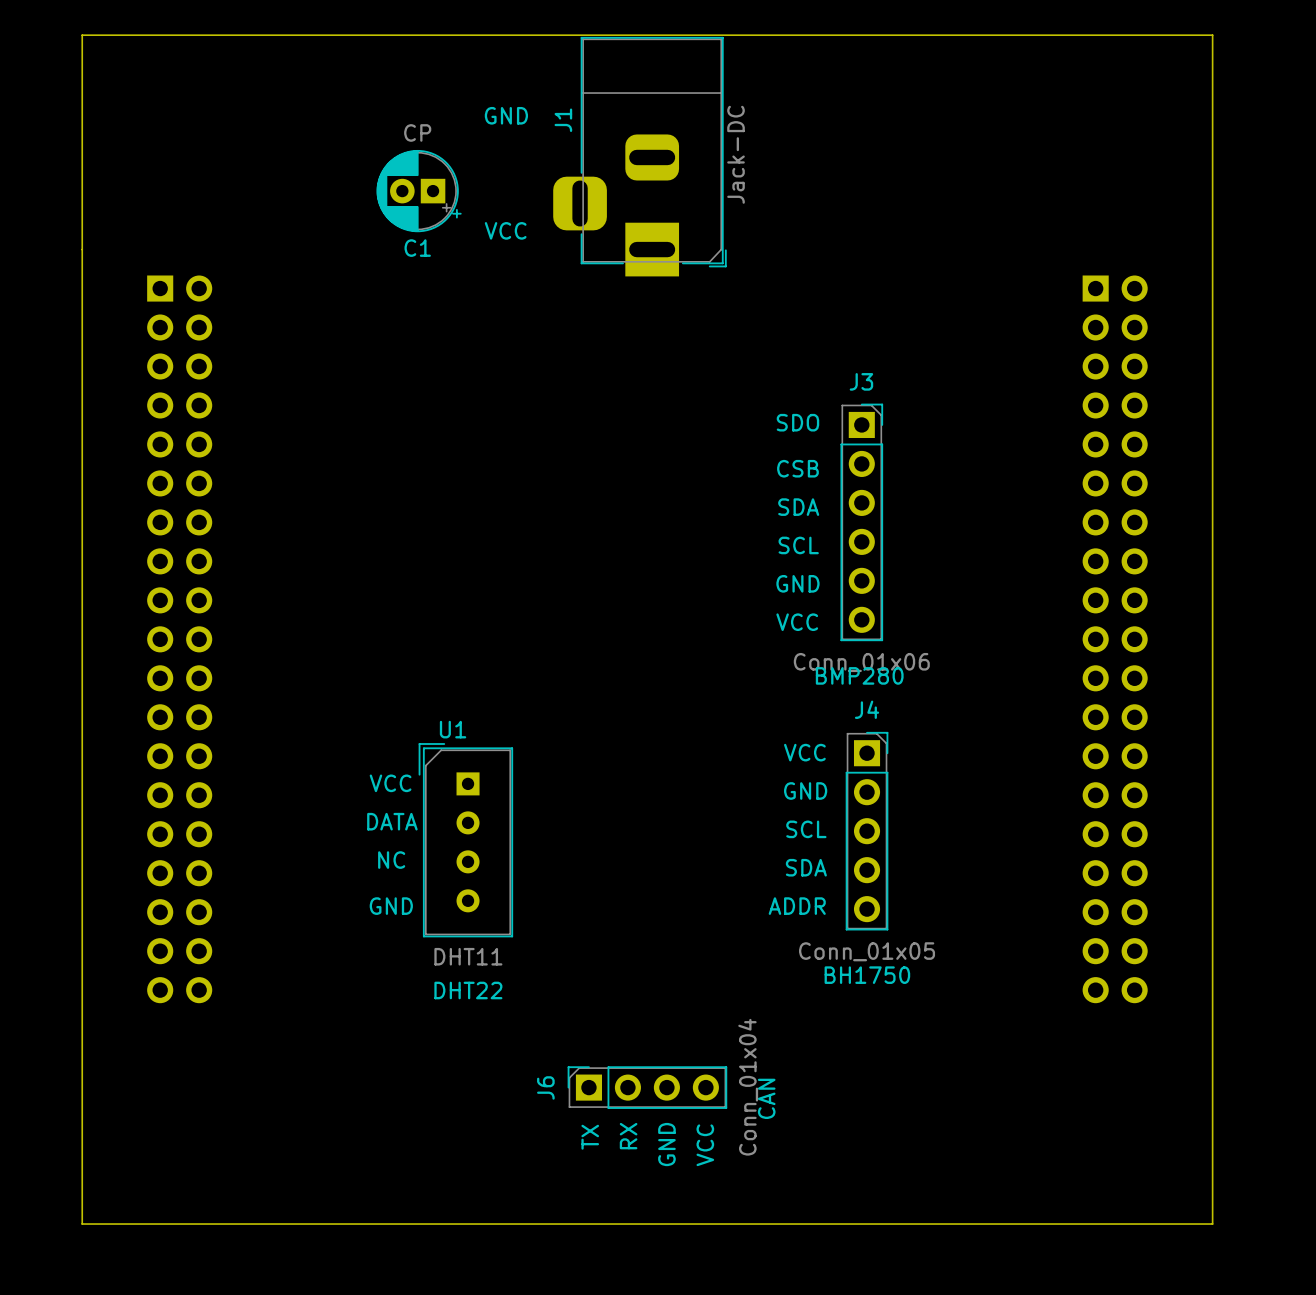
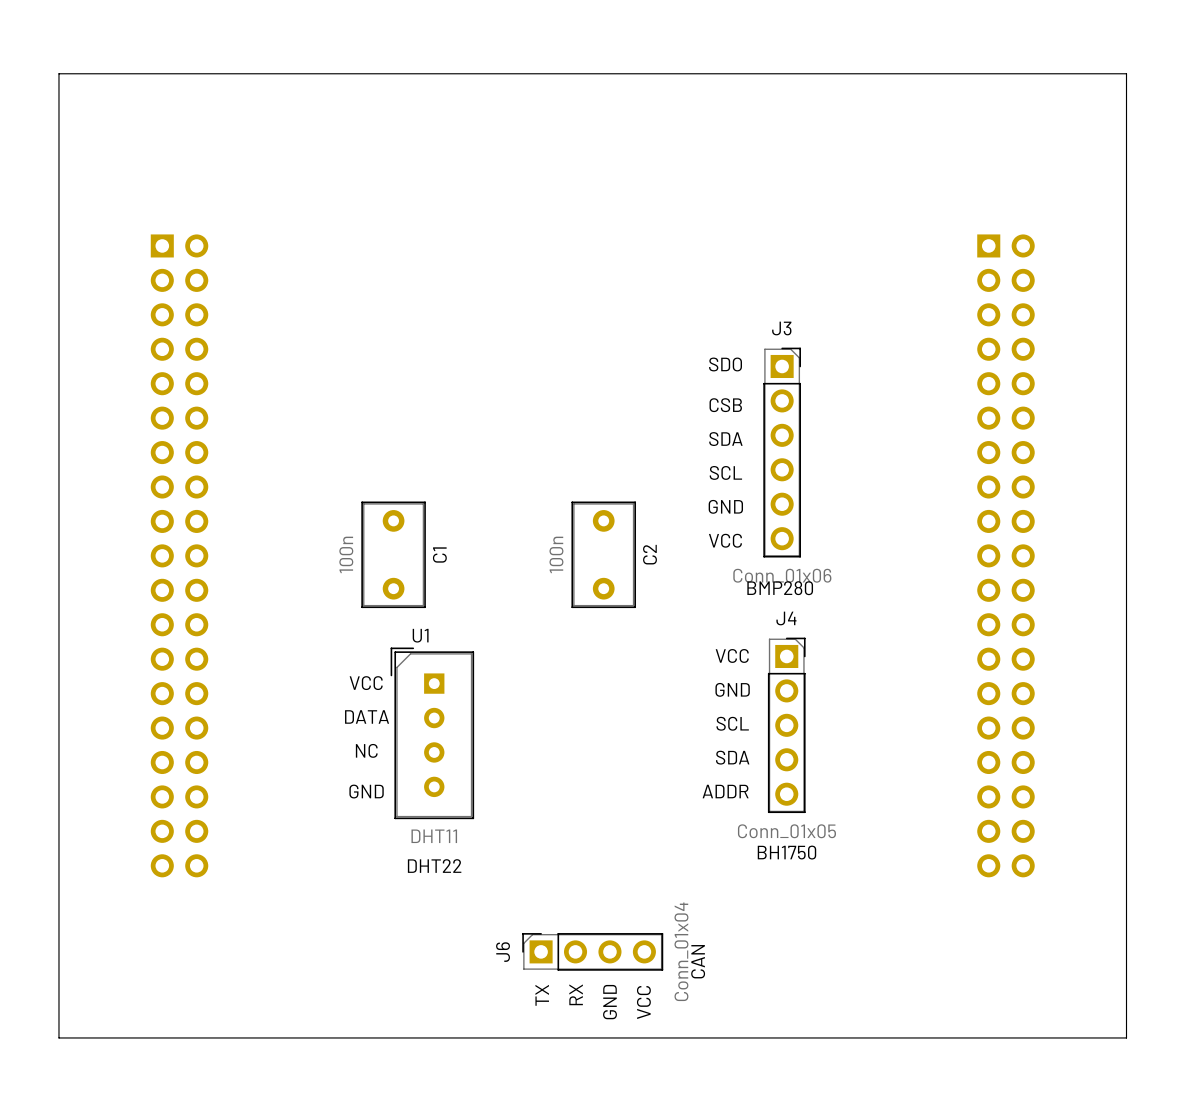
board edge: (82, 35) (82, 1224) (1212, 1224) (1212, 35) (82, 35) -> (58, 73) (58, 1037) (1126, 1037) (1126, 73) (58, 73)
text: GND (506, 115) -> none
C1 value: CP (417, 132) -> 100n (346, 554)
C1 footprint: [376, 149, 462, 233] -> [361, 501, 426, 609]
J1: Jack-DC (639, 156) -> none
text: VCC (505, 230) -> none
C1 name position: C1 (417, 248) -> C1 (439, 554)
C2: none -> 100n (603, 554)

